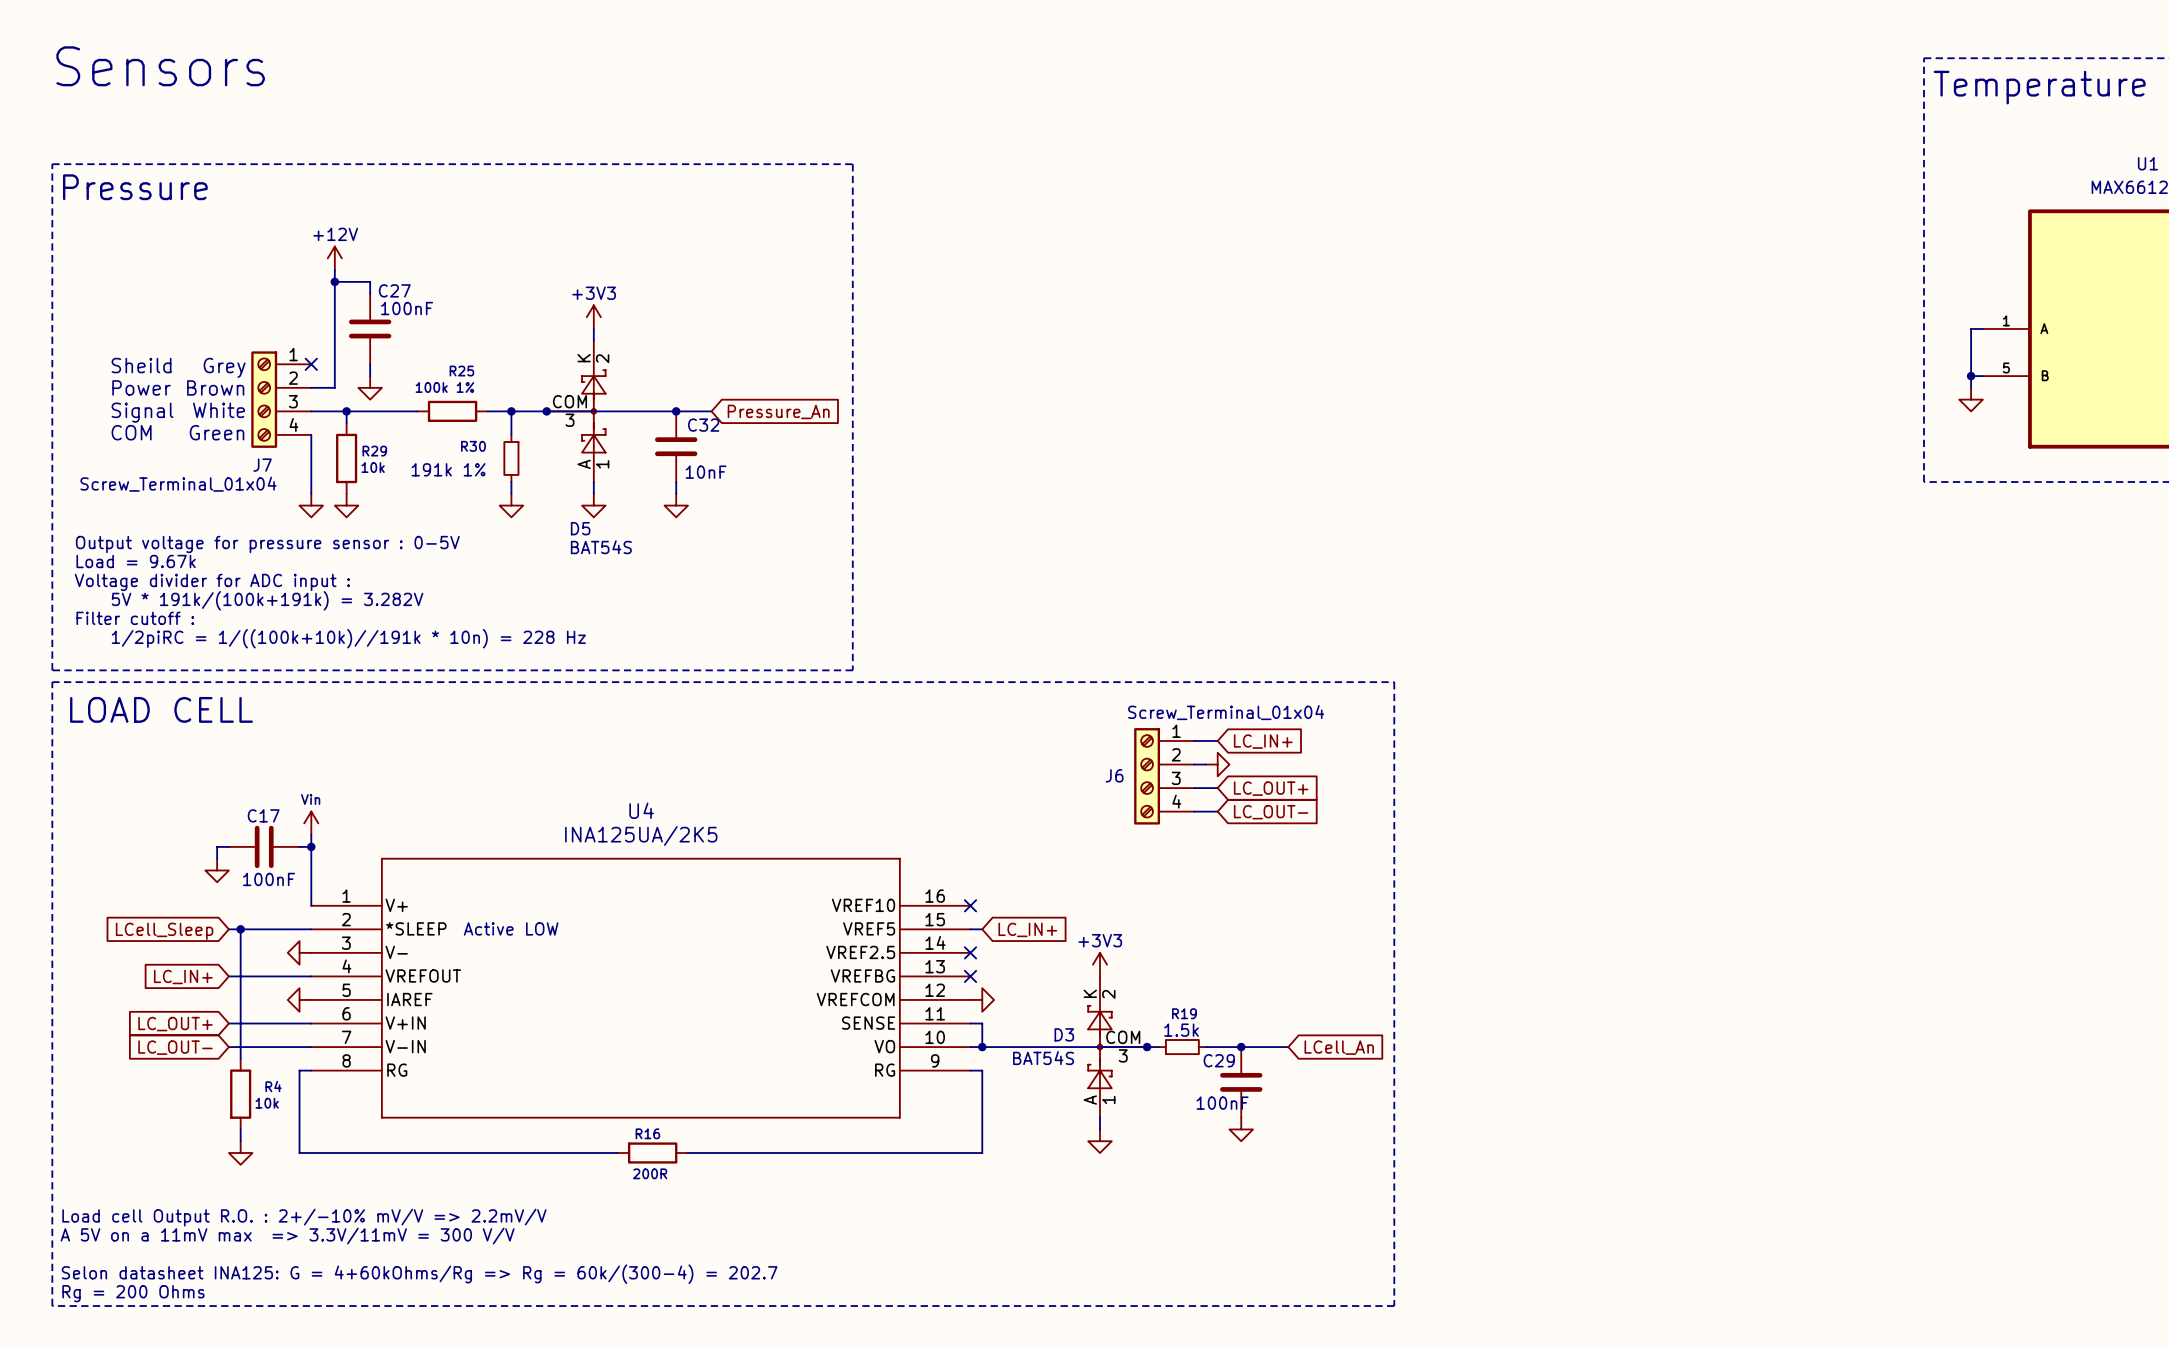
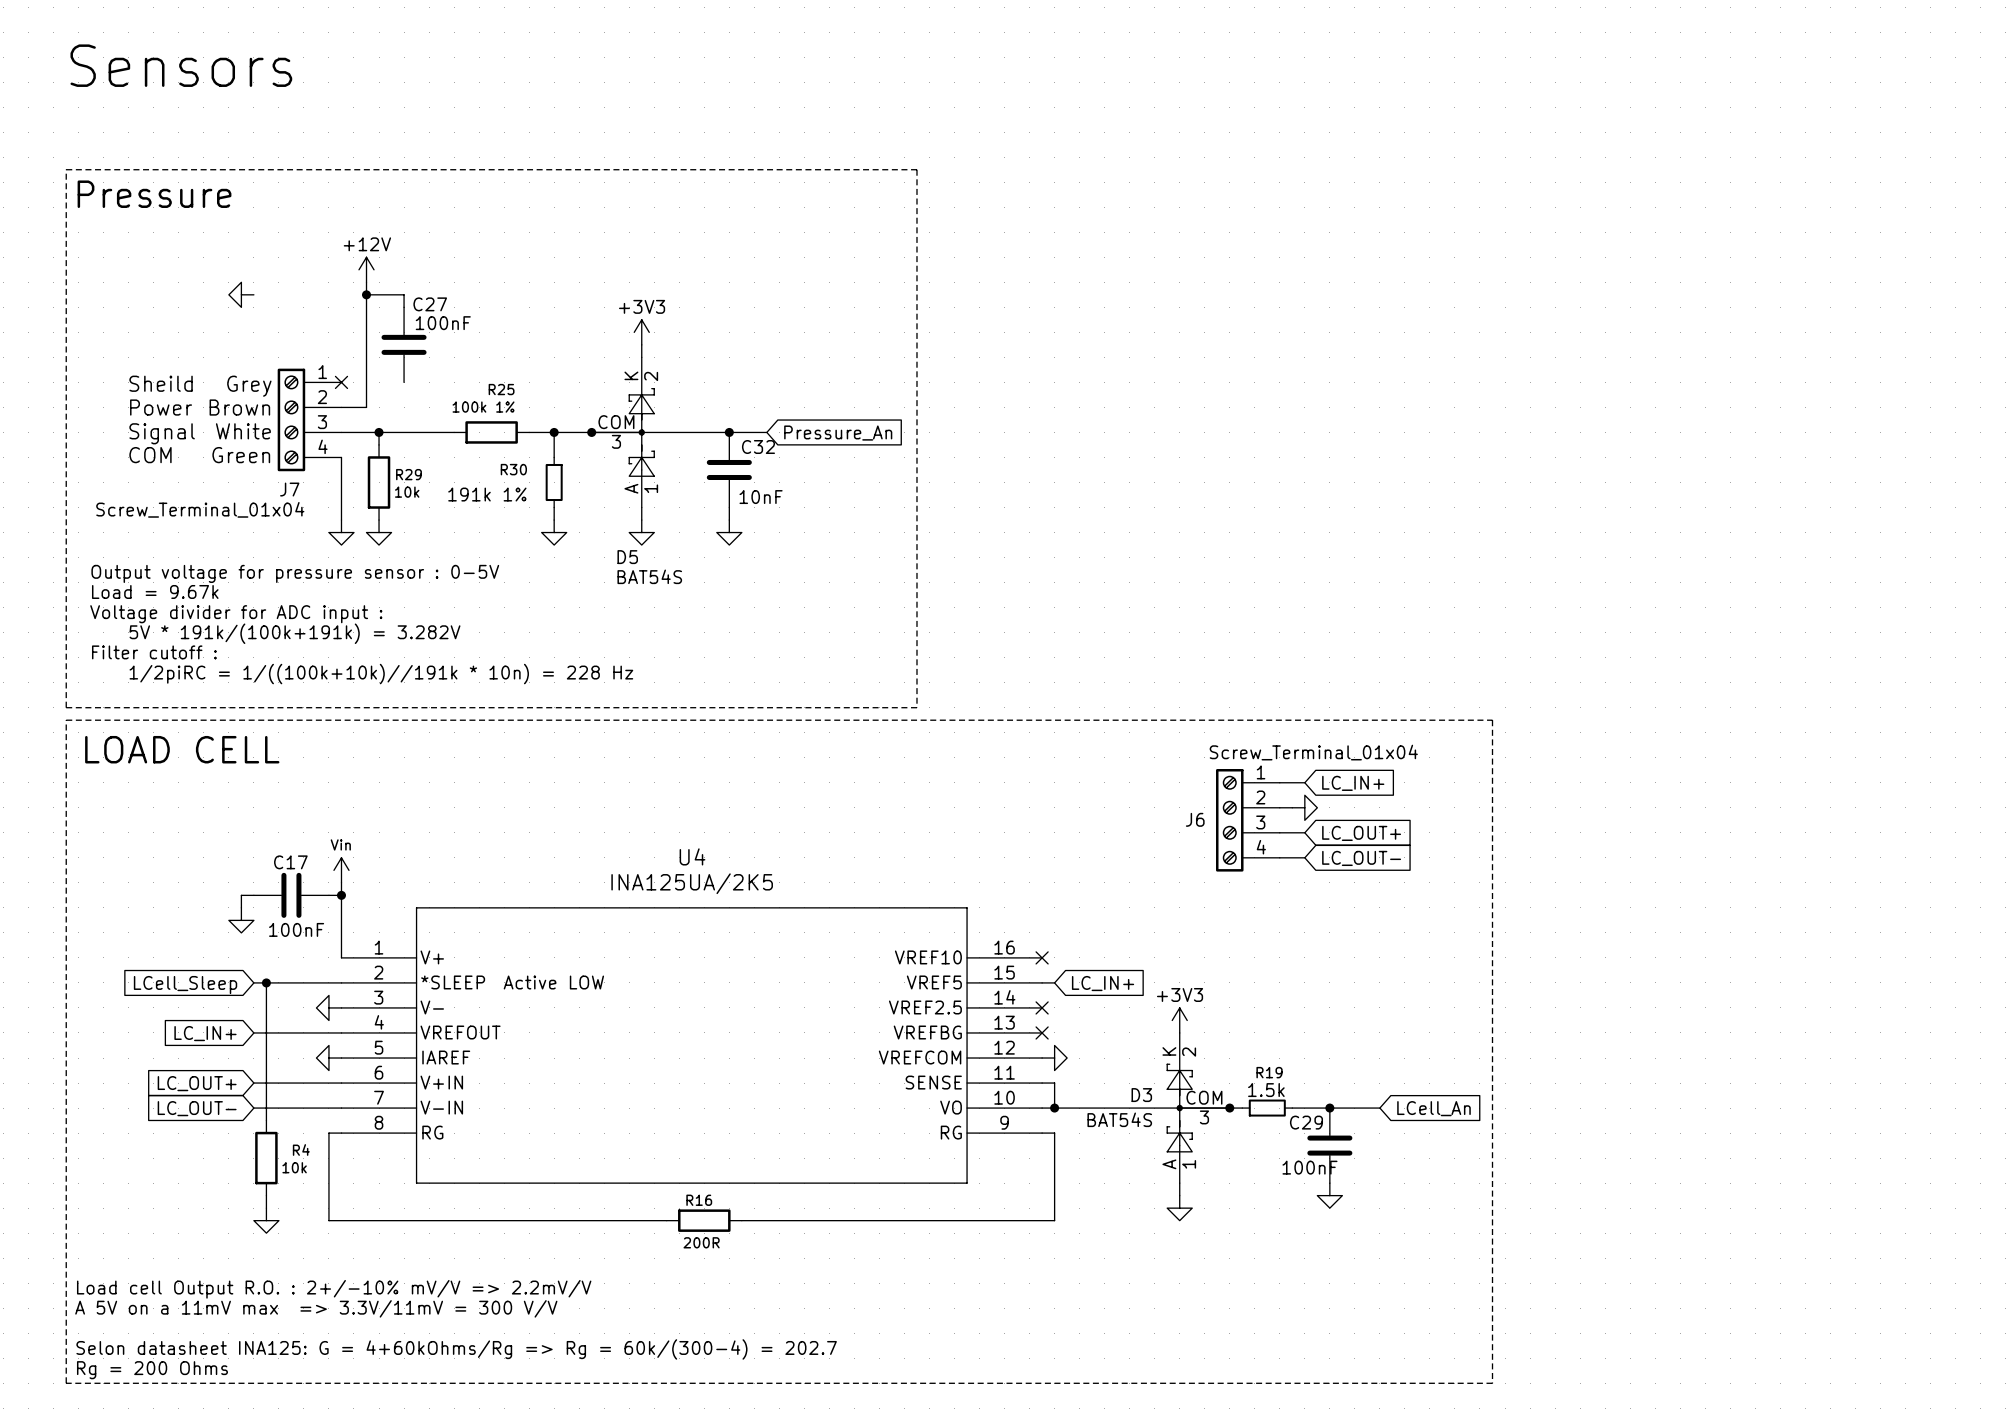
wire: (370, 364) (370, 376) -> none
power symbol rotation: 0° (370, 387) -> 90° clockwise (241, 294)
power symbol position: (370, 387) -> (241, 294)

